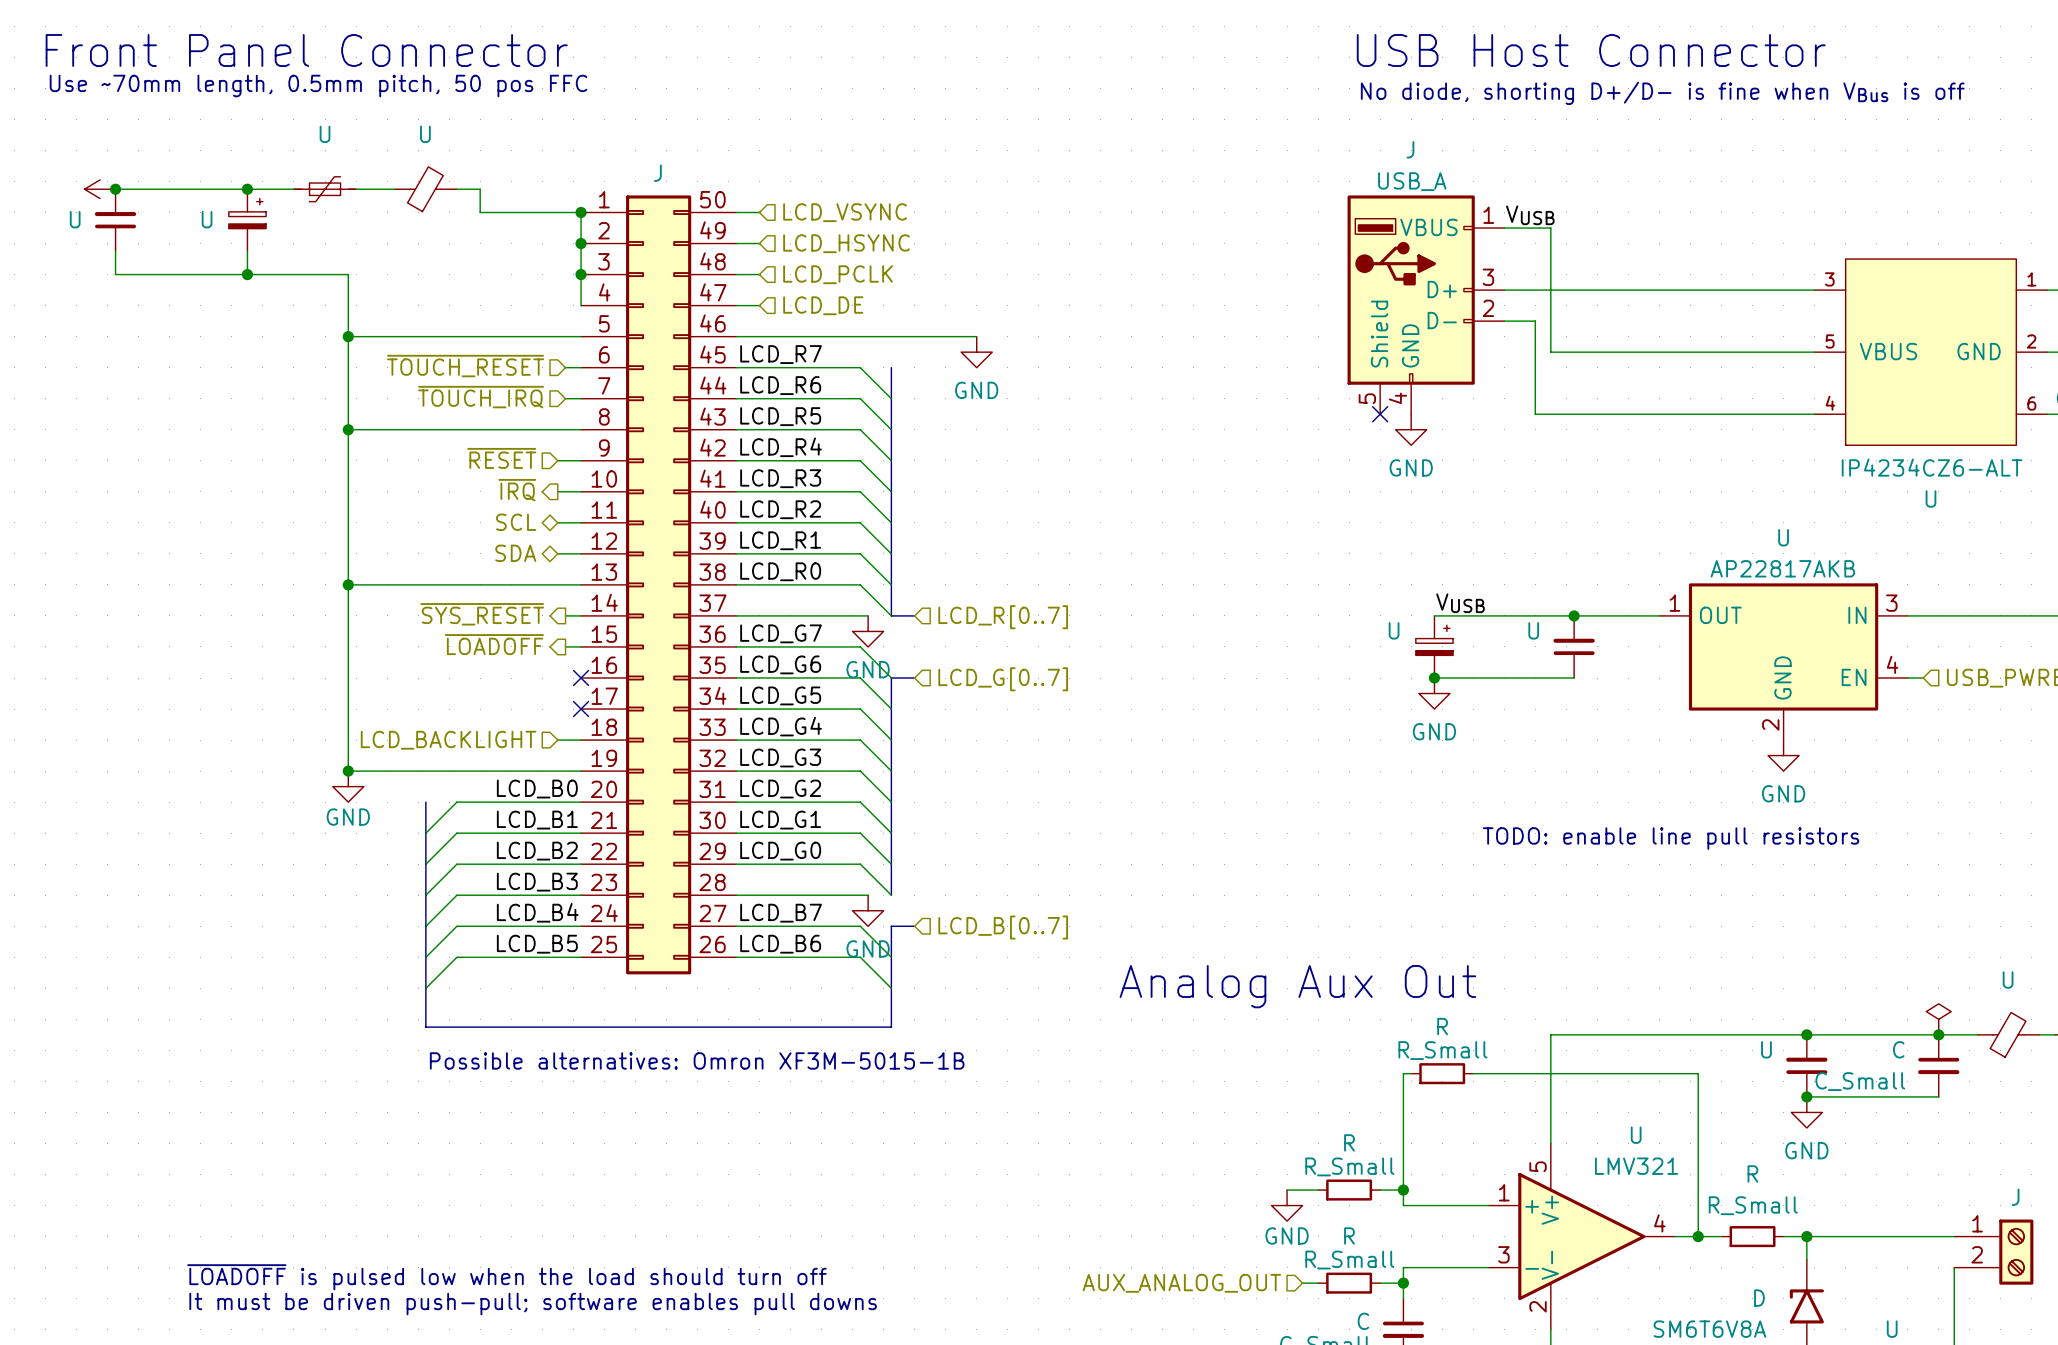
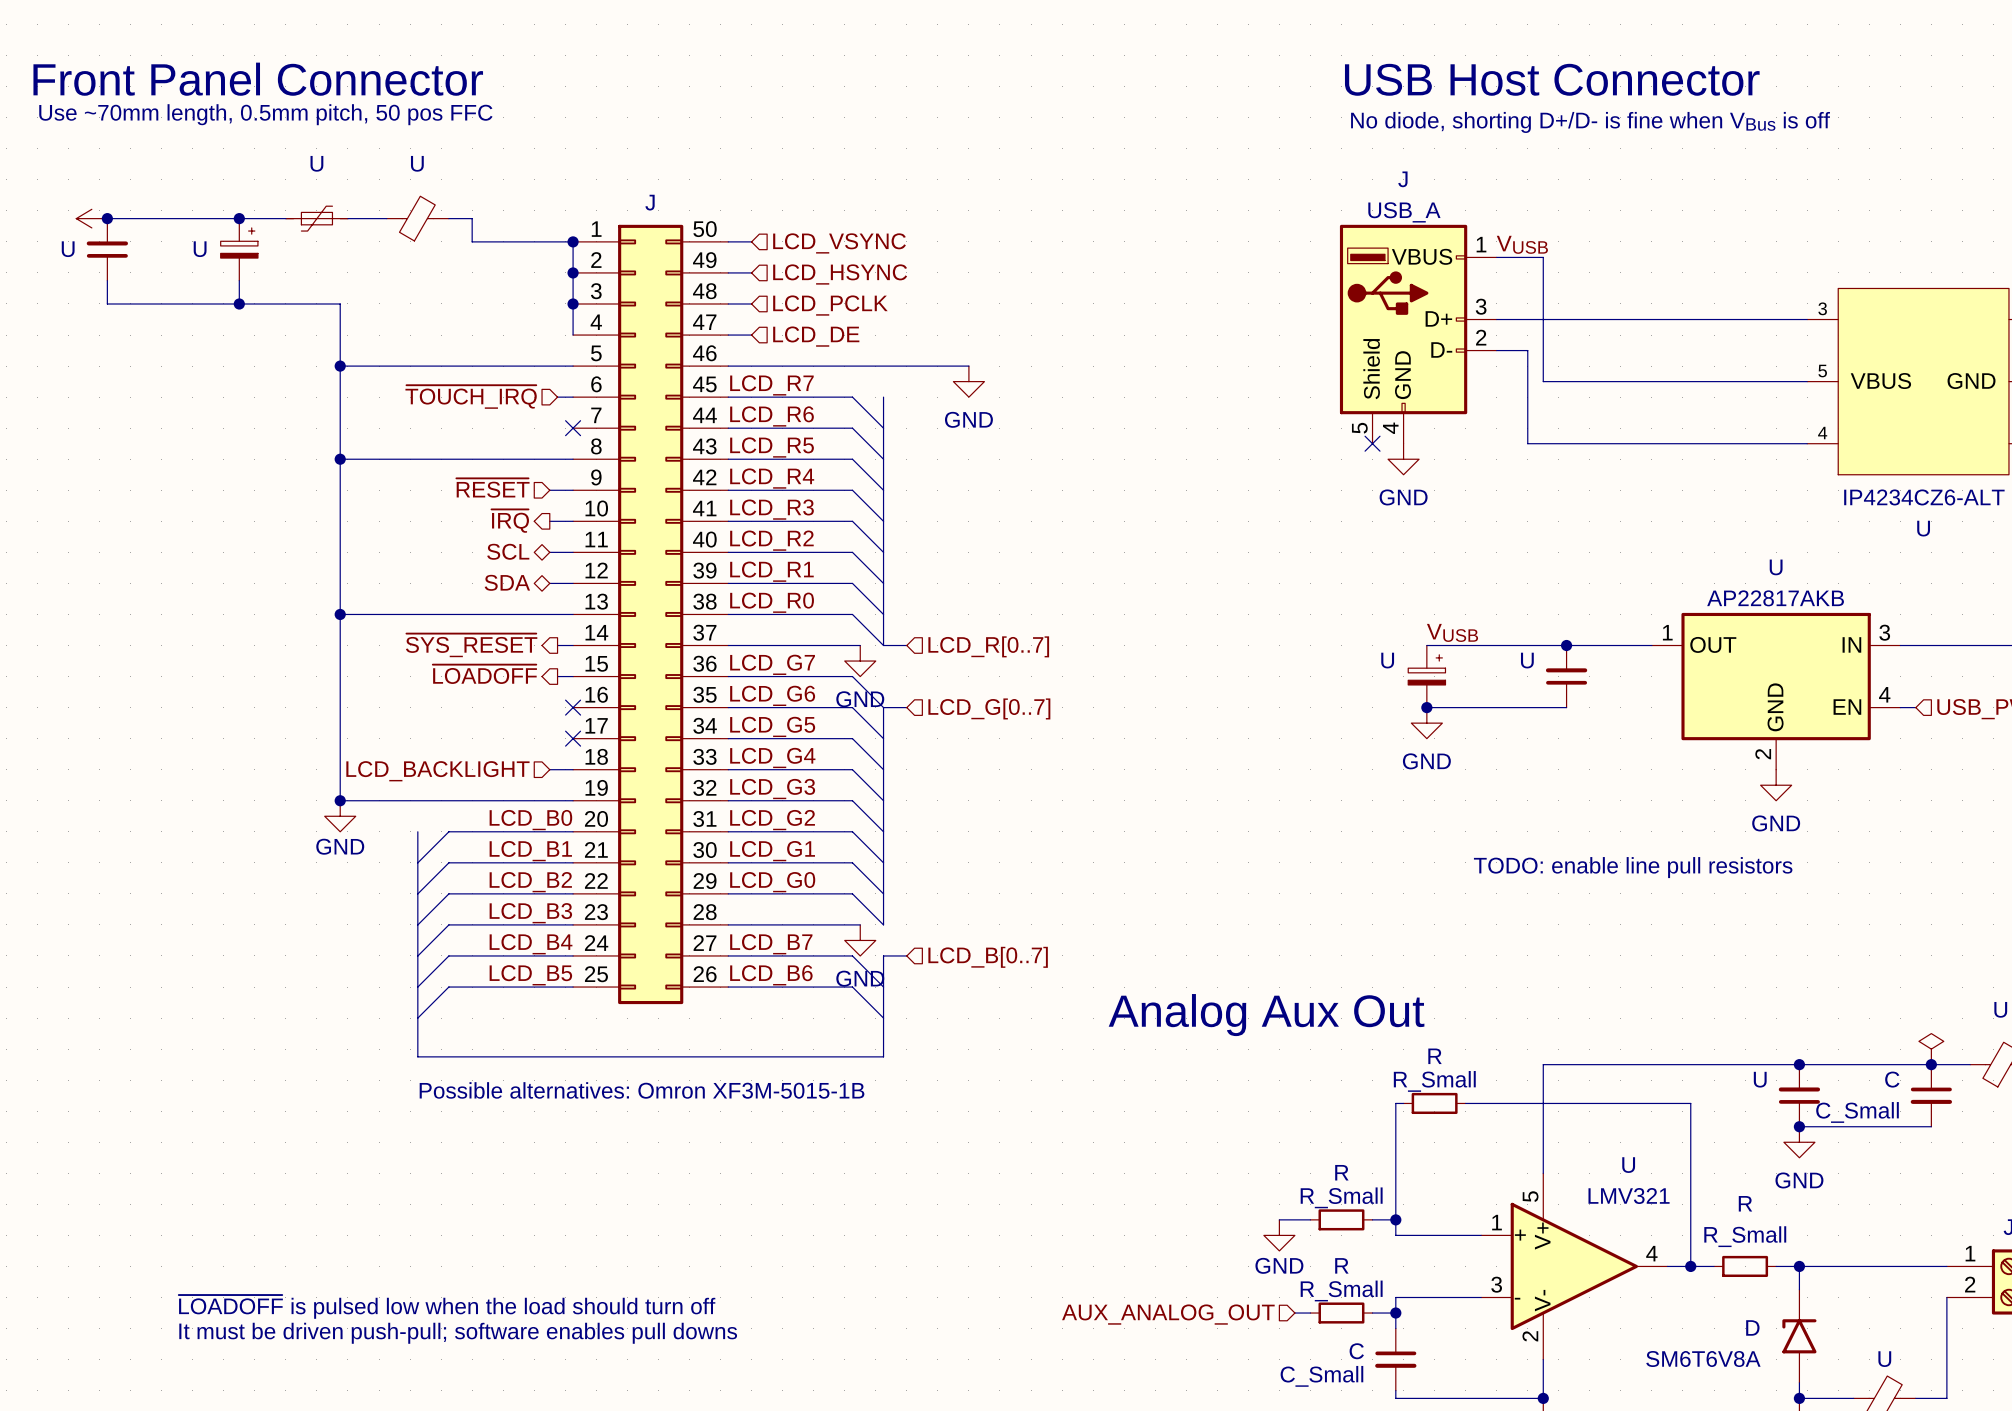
hierarchical label: ~{TOUCH_RESET} (465, 366) -> ~{TOUCH_IRQ} (471, 397)
hierarchical label: ~{TOUCH_IRQ} (481, 397) -> none
wire: (565, 398) (581, 398) -> none
no-connect mark: none -> (573, 428)

